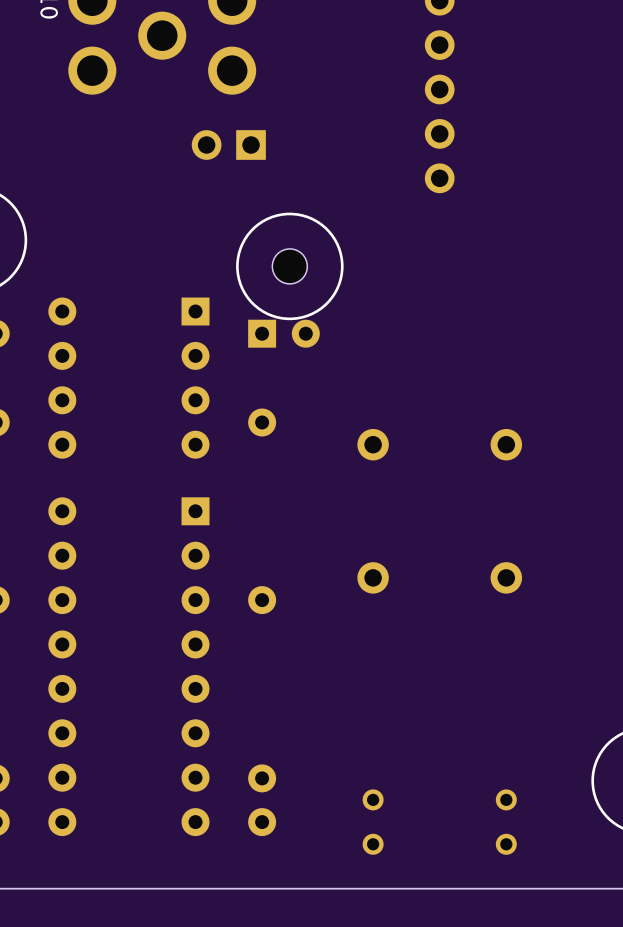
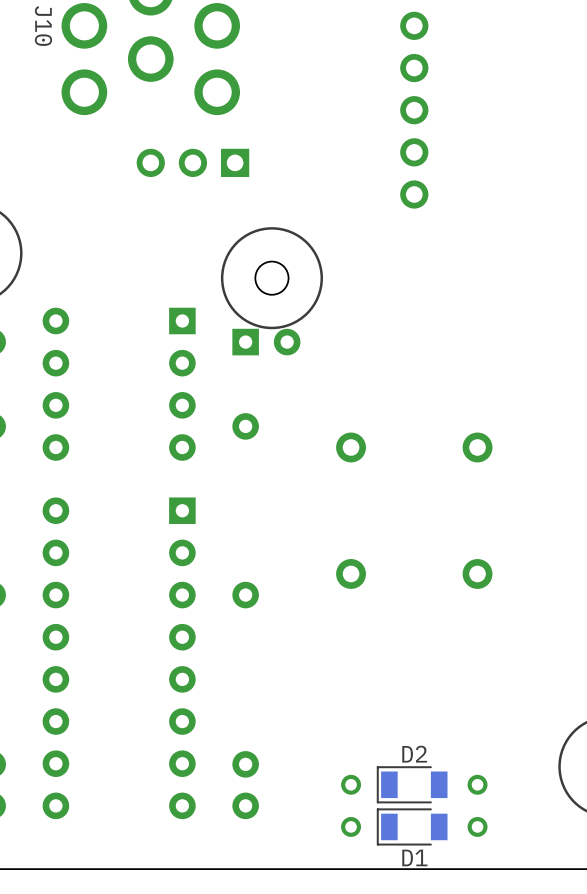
part: none -> (192, 162)
D2: none -> (412, 784)
D1: none -> (412, 826)

